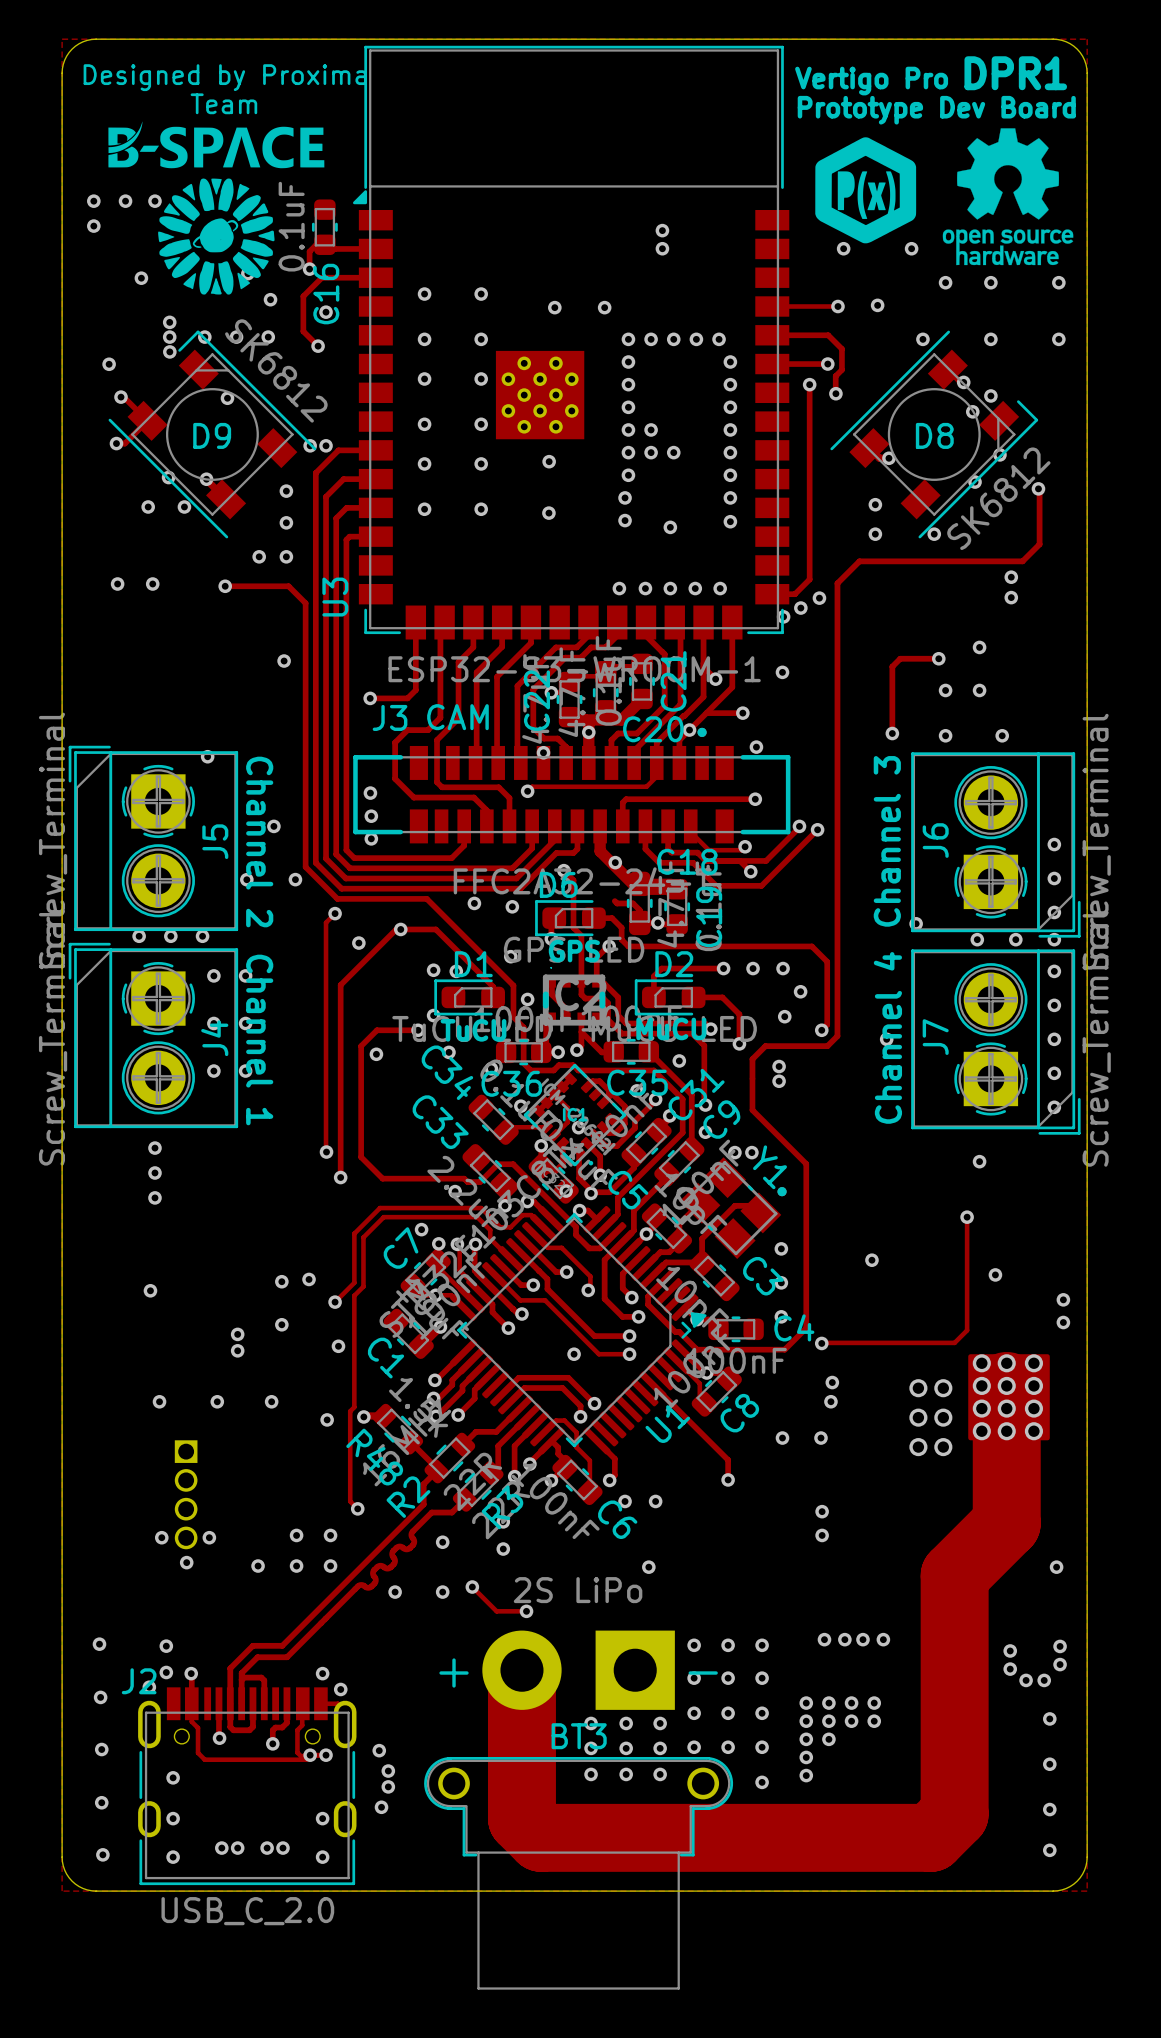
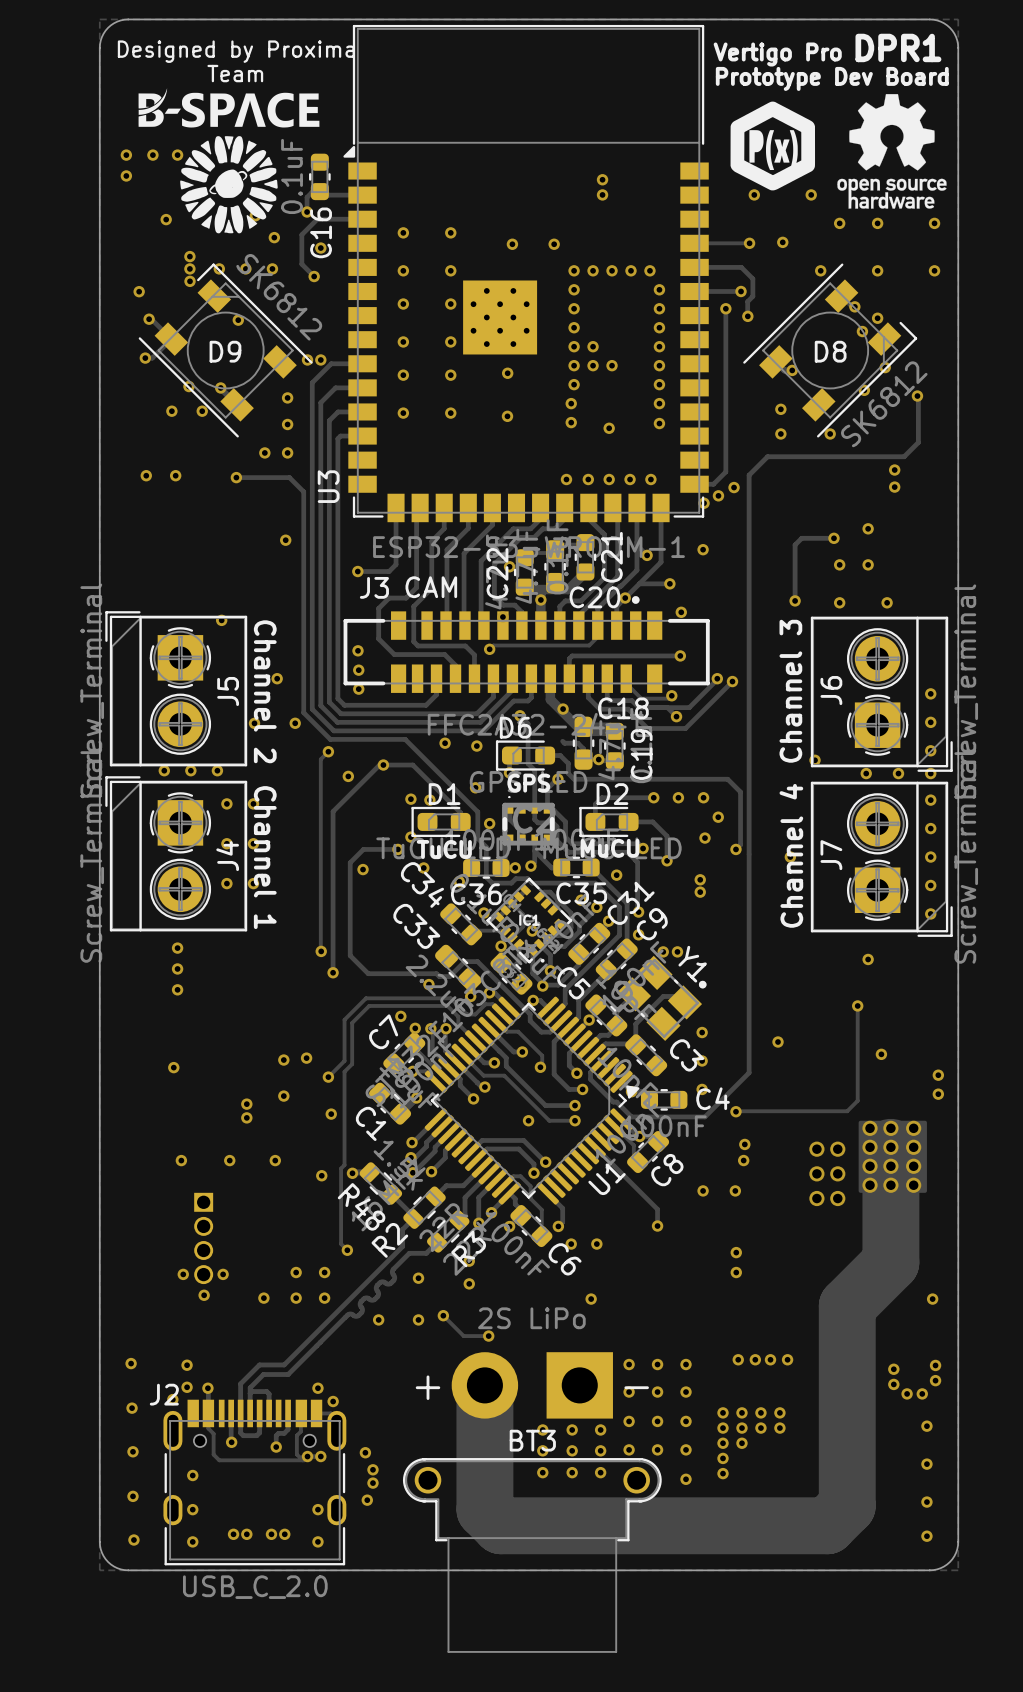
track: (837, 1036) (827, 1046) (765, 1046) (752, 1059) (752, 1110) (806, 1163) (806, 1328) -> (749, 854) (749, 1072) (723, 1098)

